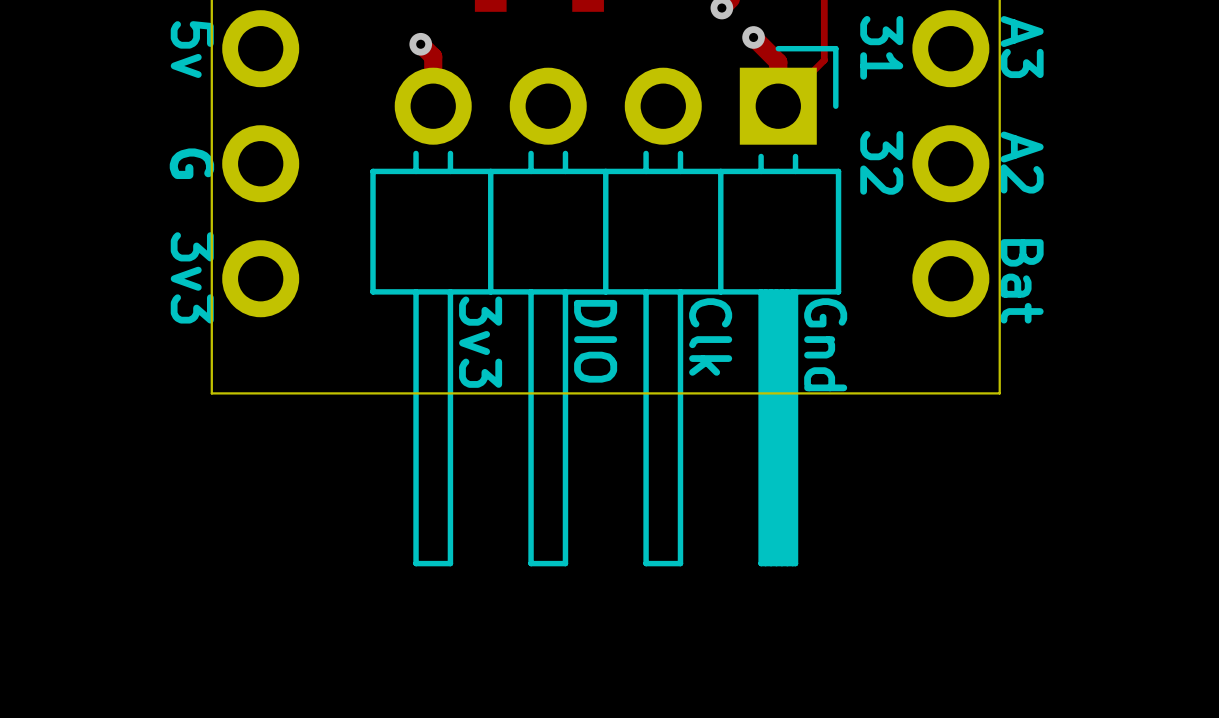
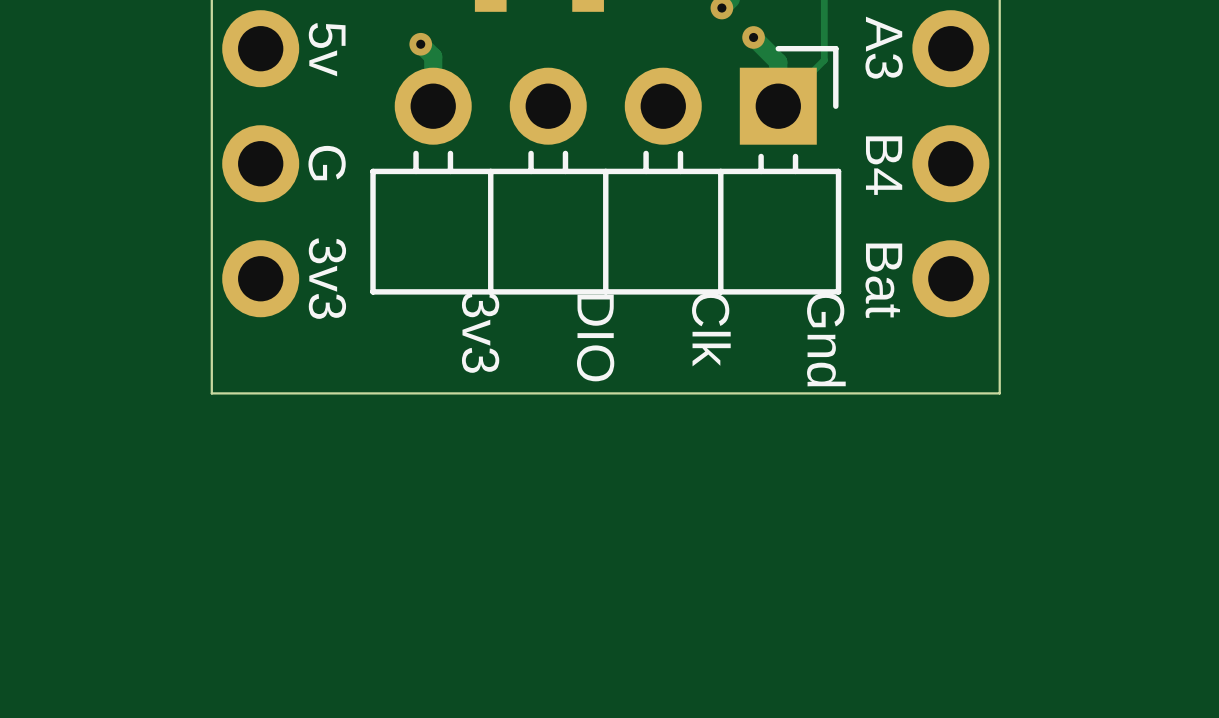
text: 31 (881, 47) -> A3 (884, 47)
text: A3 (1022, 47) -> none
text position: 5v (192, 49) -> 5v (327, 49)
text: 32 (881, 162) -> B4 (884, 165)
text: A2 (1022, 162) -> none
text position: G (191, 163) -> G (327, 163)
part: none -> (605, 170)
text position: 3v3 (192, 277) -> 3v3 (327, 278)
text position: Bat (1022, 281) -> Bat (883, 280)
part: (605, 306) -> none

